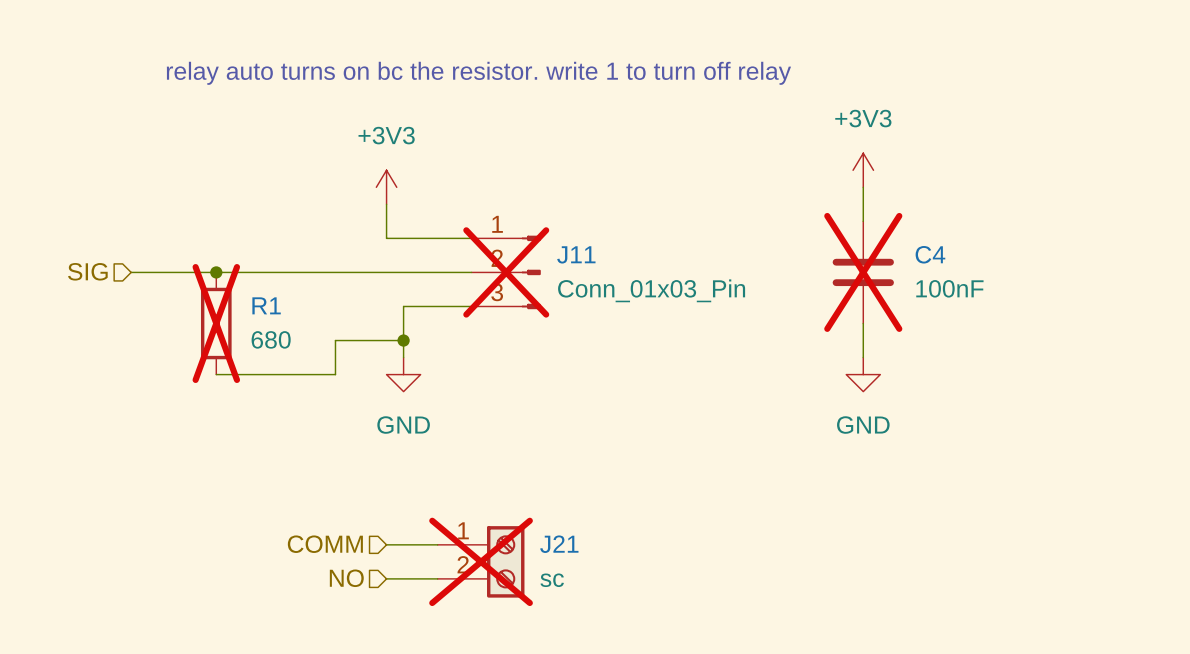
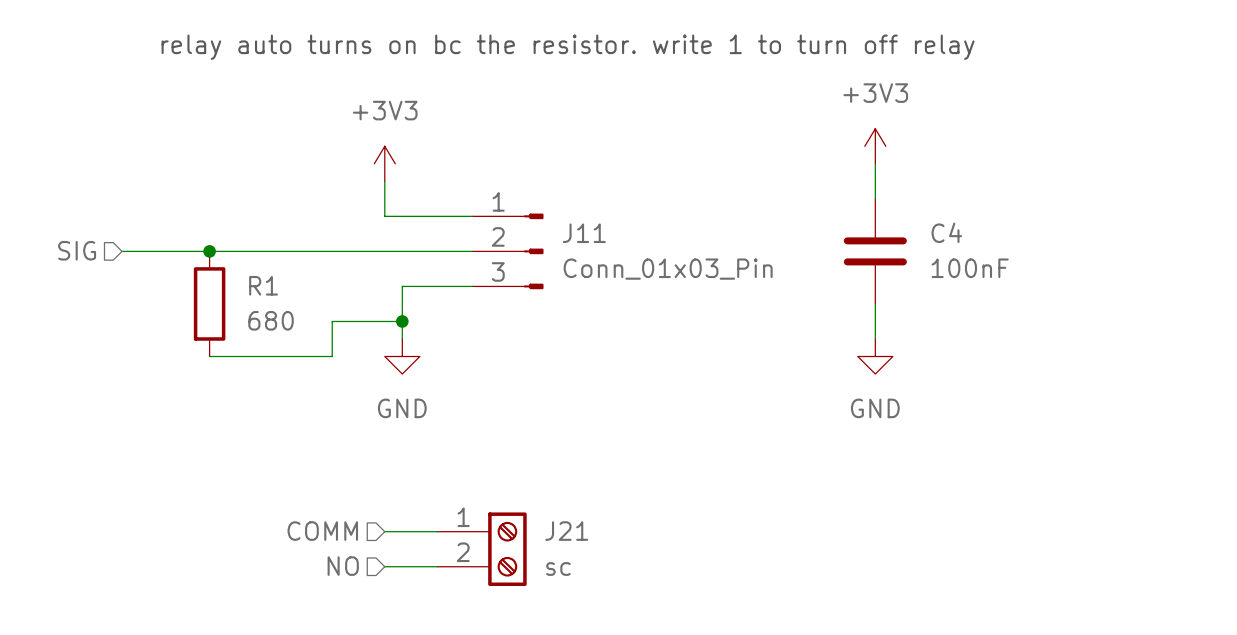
J11 do-not-place cross: (506, 272) -> none
C4 do-not-place cross: (863, 272) -> none
R1 do-not-place cross: (216, 323) -> none
J21 do-not-place cross: (481, 561) -> none

